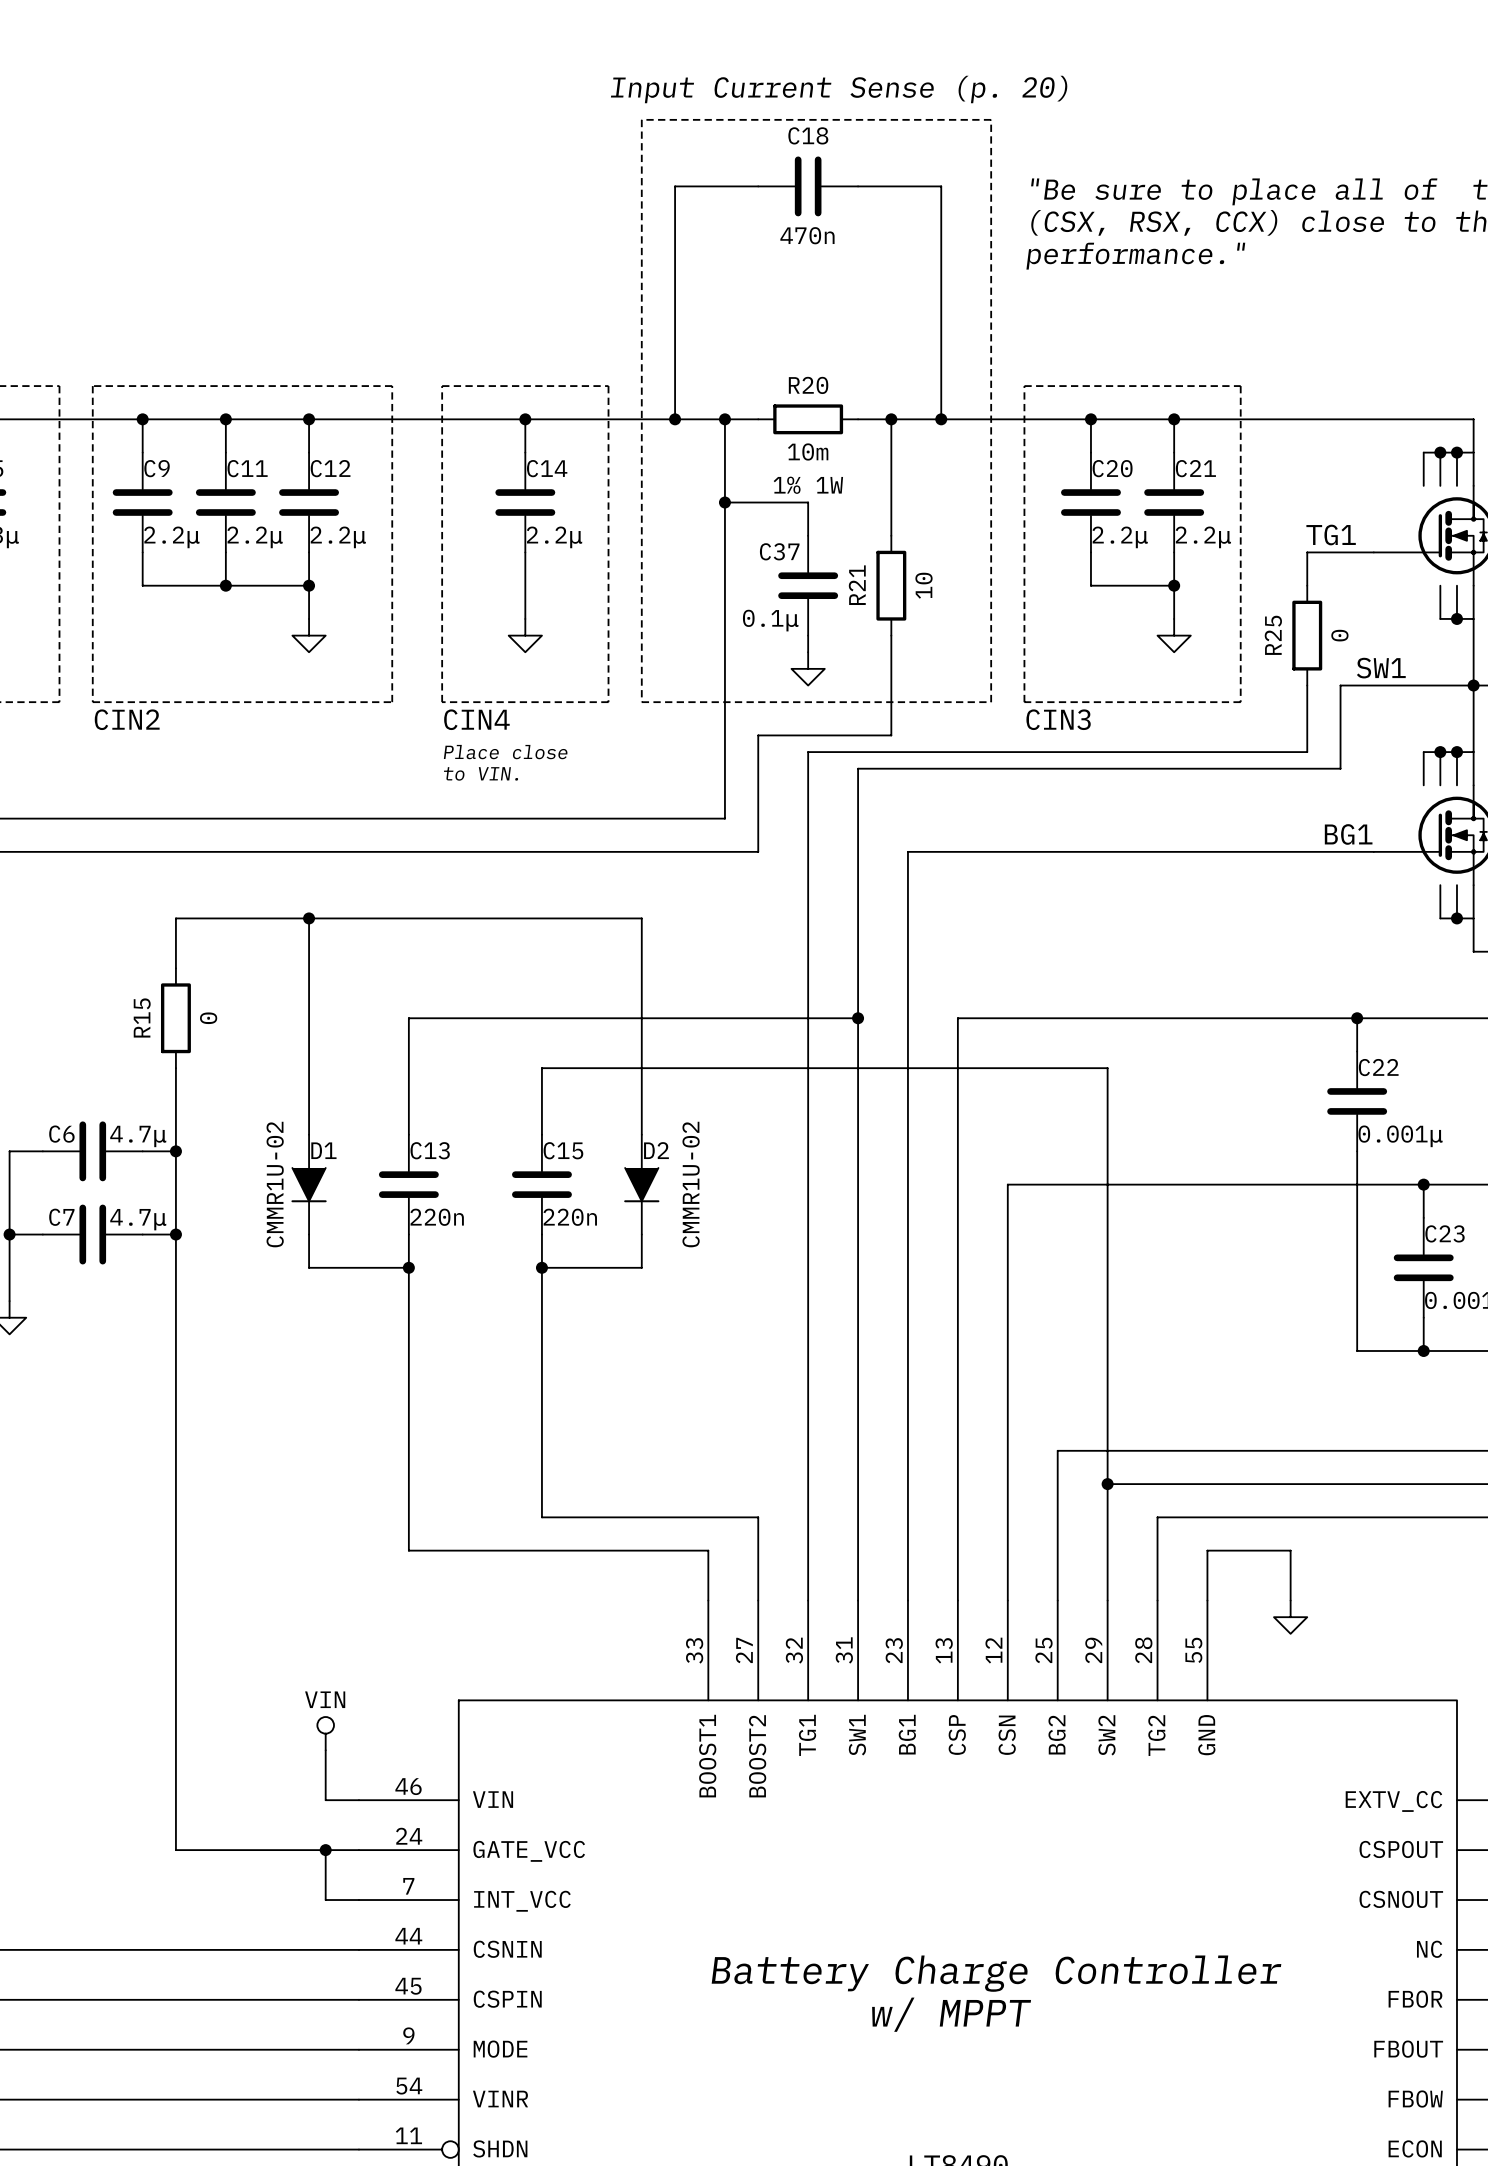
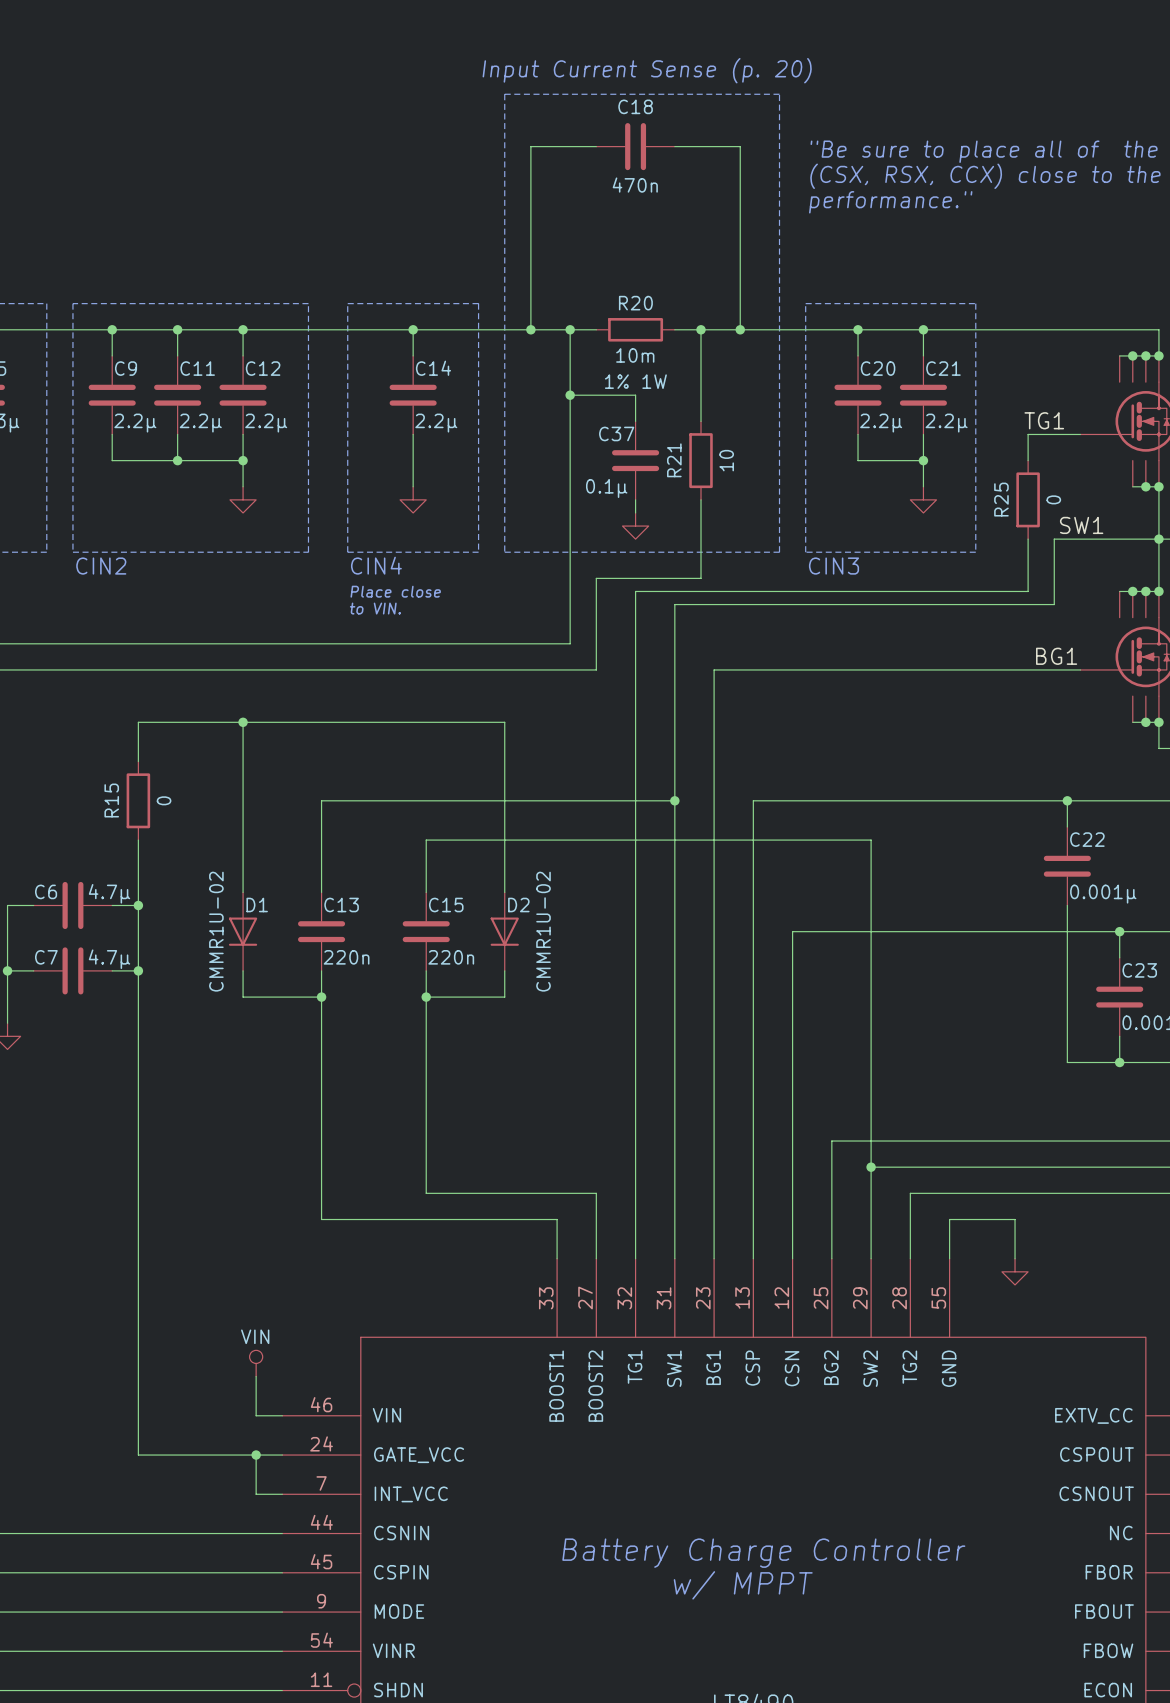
junction: none -> (1158, 355)
junction: none -> (1158, 486)
junction: none -> (1158, 591)
junction: none -> (1158, 722)
D1 symbol: [291, 1134, 327, 1235] -> [228, 892, 258, 971]
D2 symbol: [624, 1134, 660, 1235] -> [490, 892, 519, 971]

